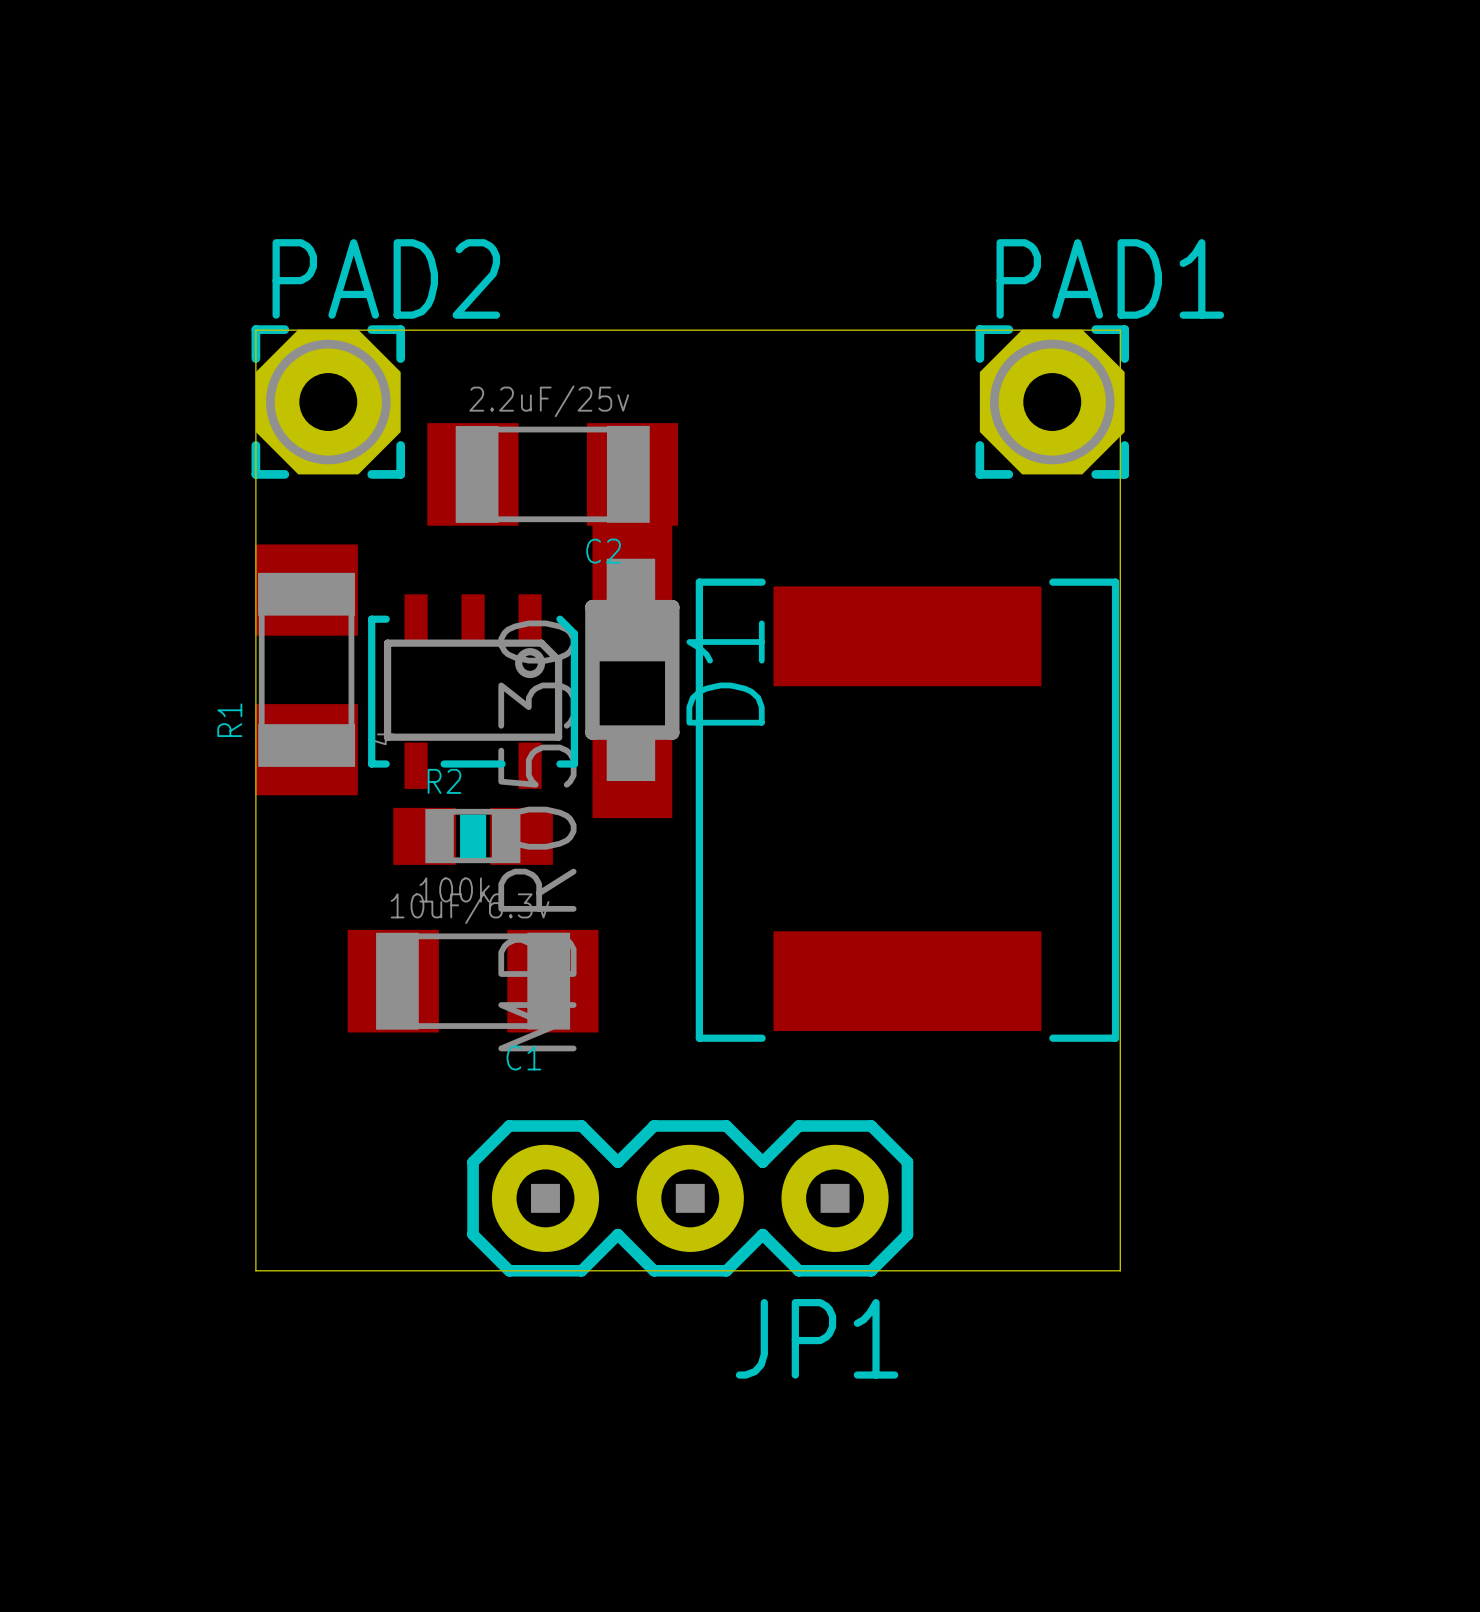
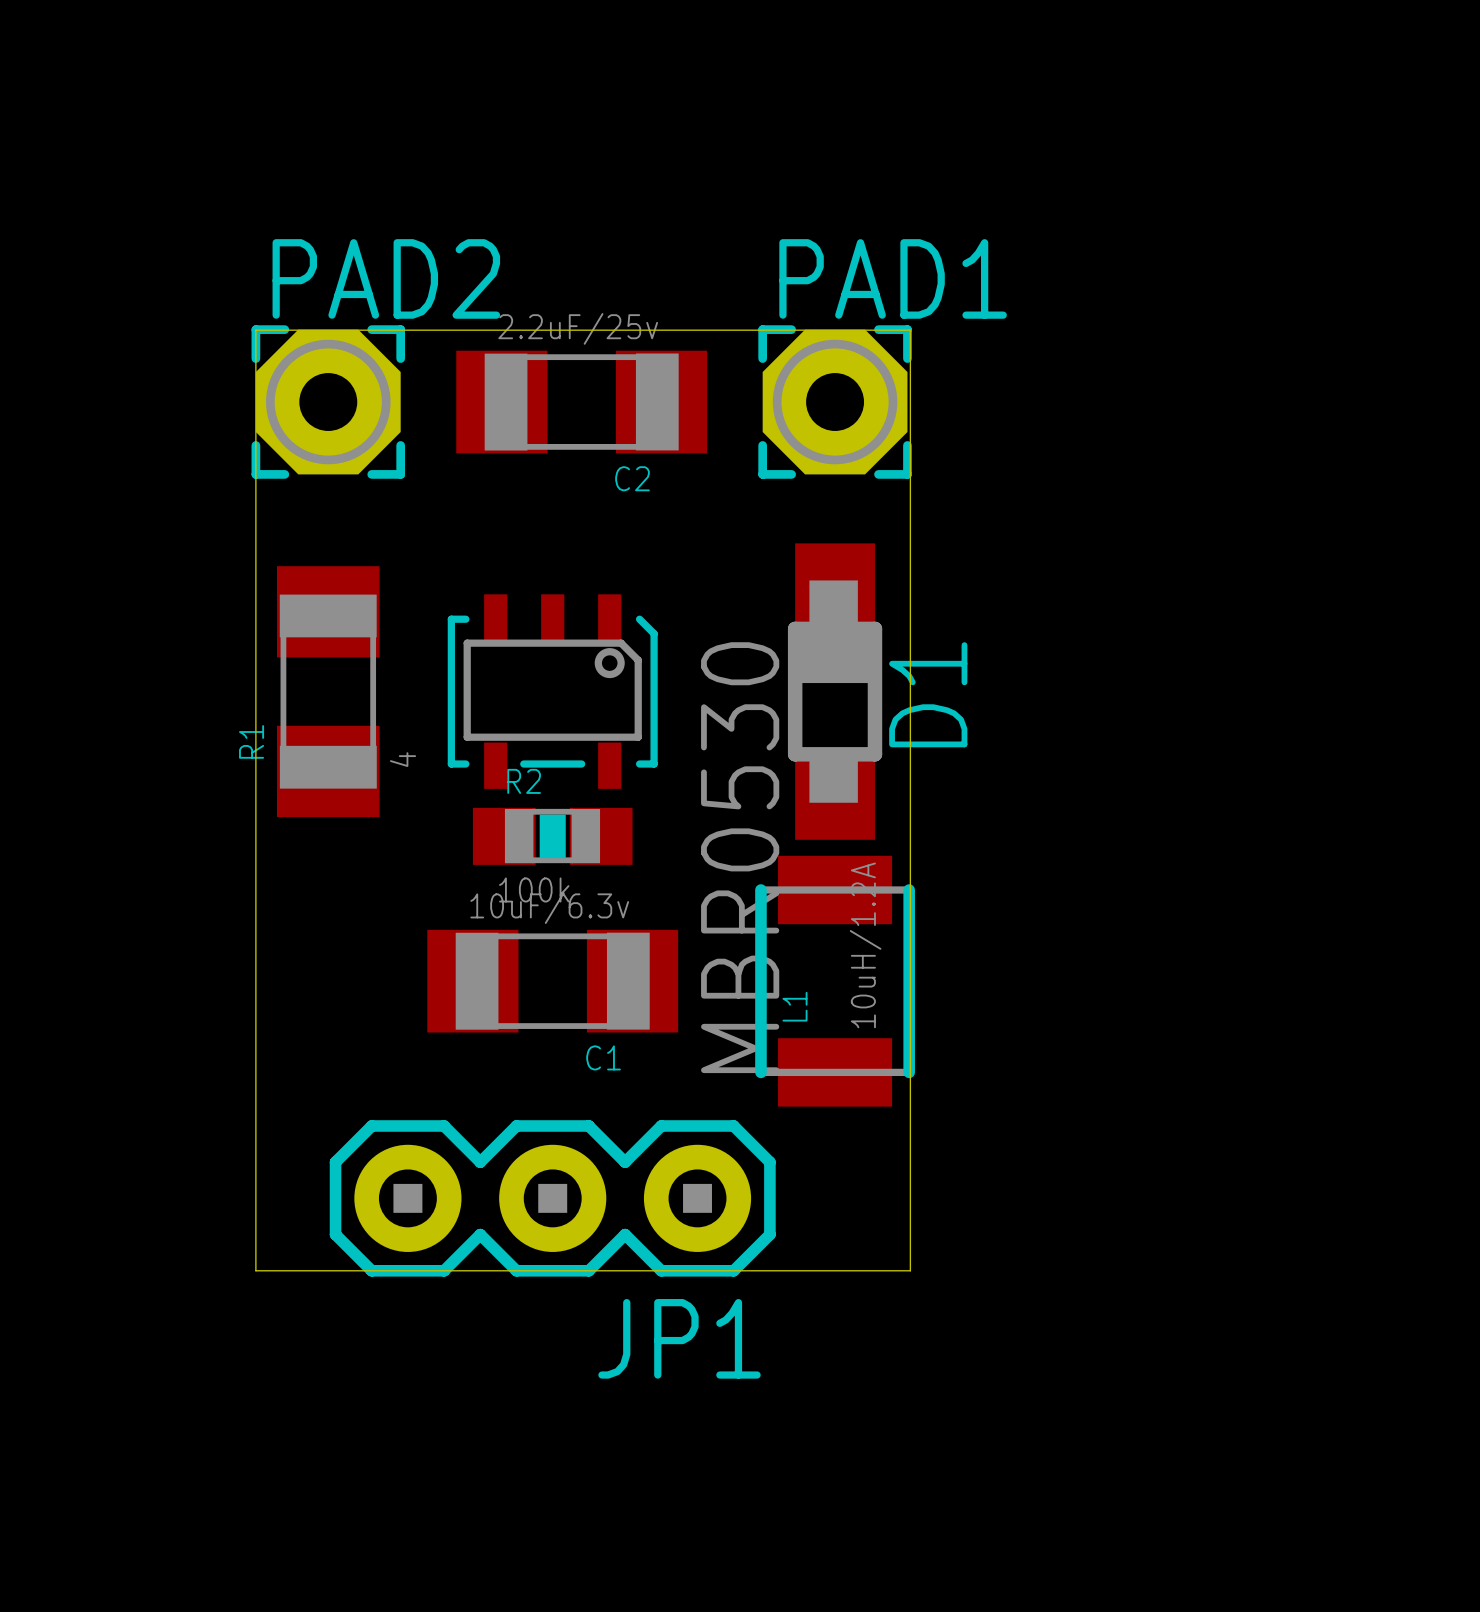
board edge: (910, 330) (1120, 330) (1120, 1270) (910, 1270) -> (910, 330) (910, 1270)
PAD1 position: (1052, 402) -> (835, 402)
C2 position: (552, 474) -> (581, 402)
R1 position: (306, 669) -> (328, 691)
D1 position: (632, 669) -> (835, 691)
part position: (473, 691) -> (552, 691)
part: (907, 810) -> none
R2 position: (473, 836) -> (552, 836)
C1 position: (473, 981) -> (552, 981)
L1: none -> 10uH/1.2A (835, 981)
JP1 position: (690, 1198) -> (552, 1198)

